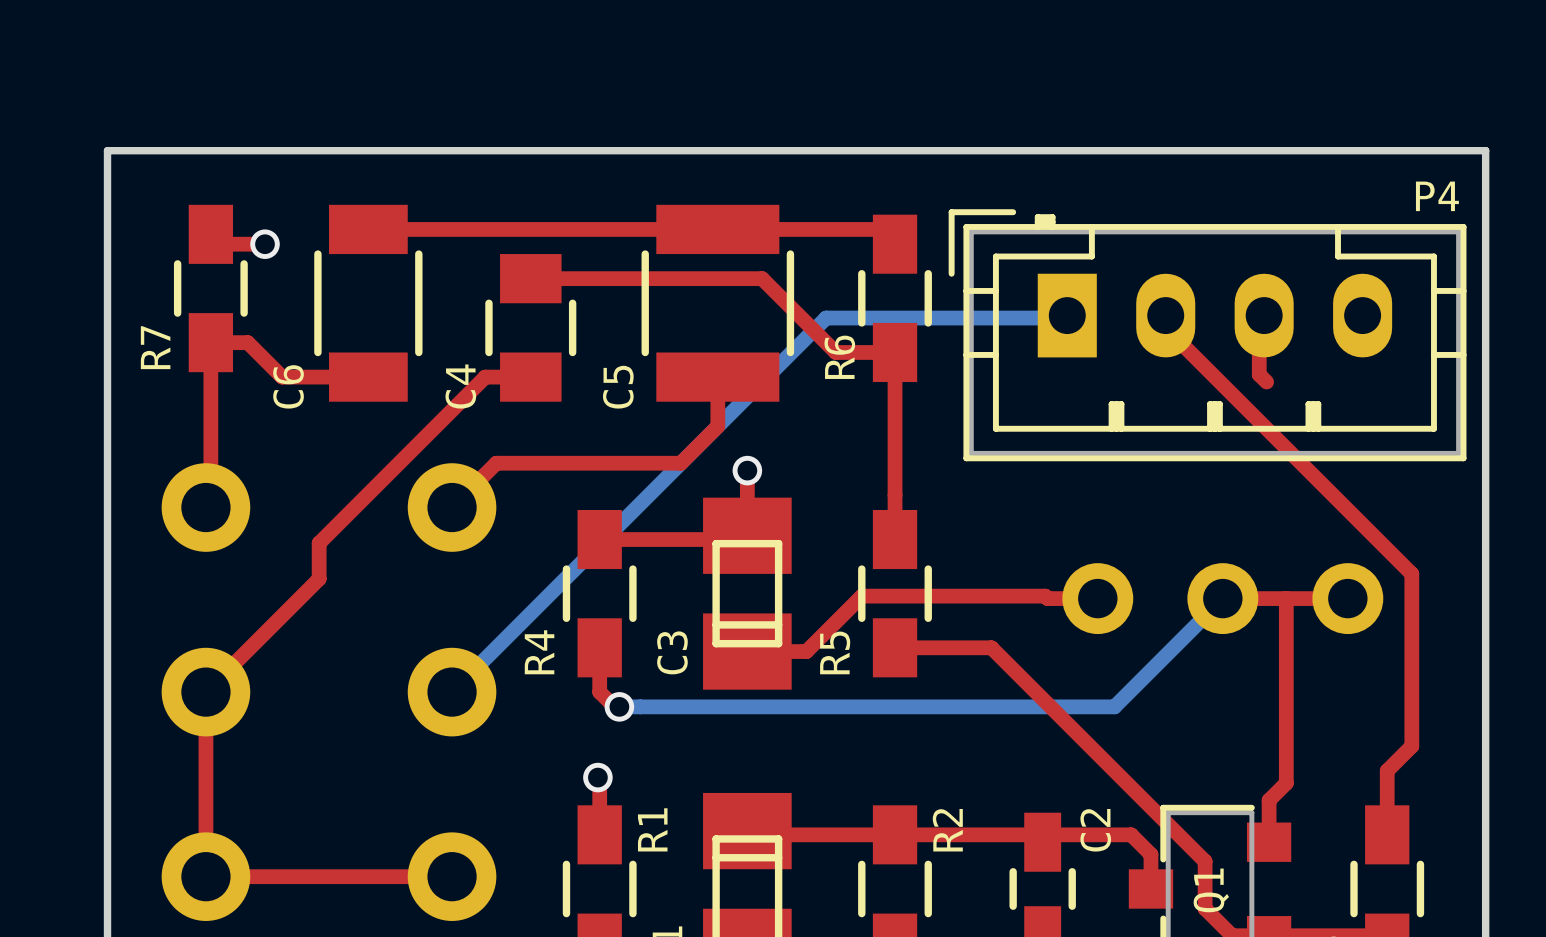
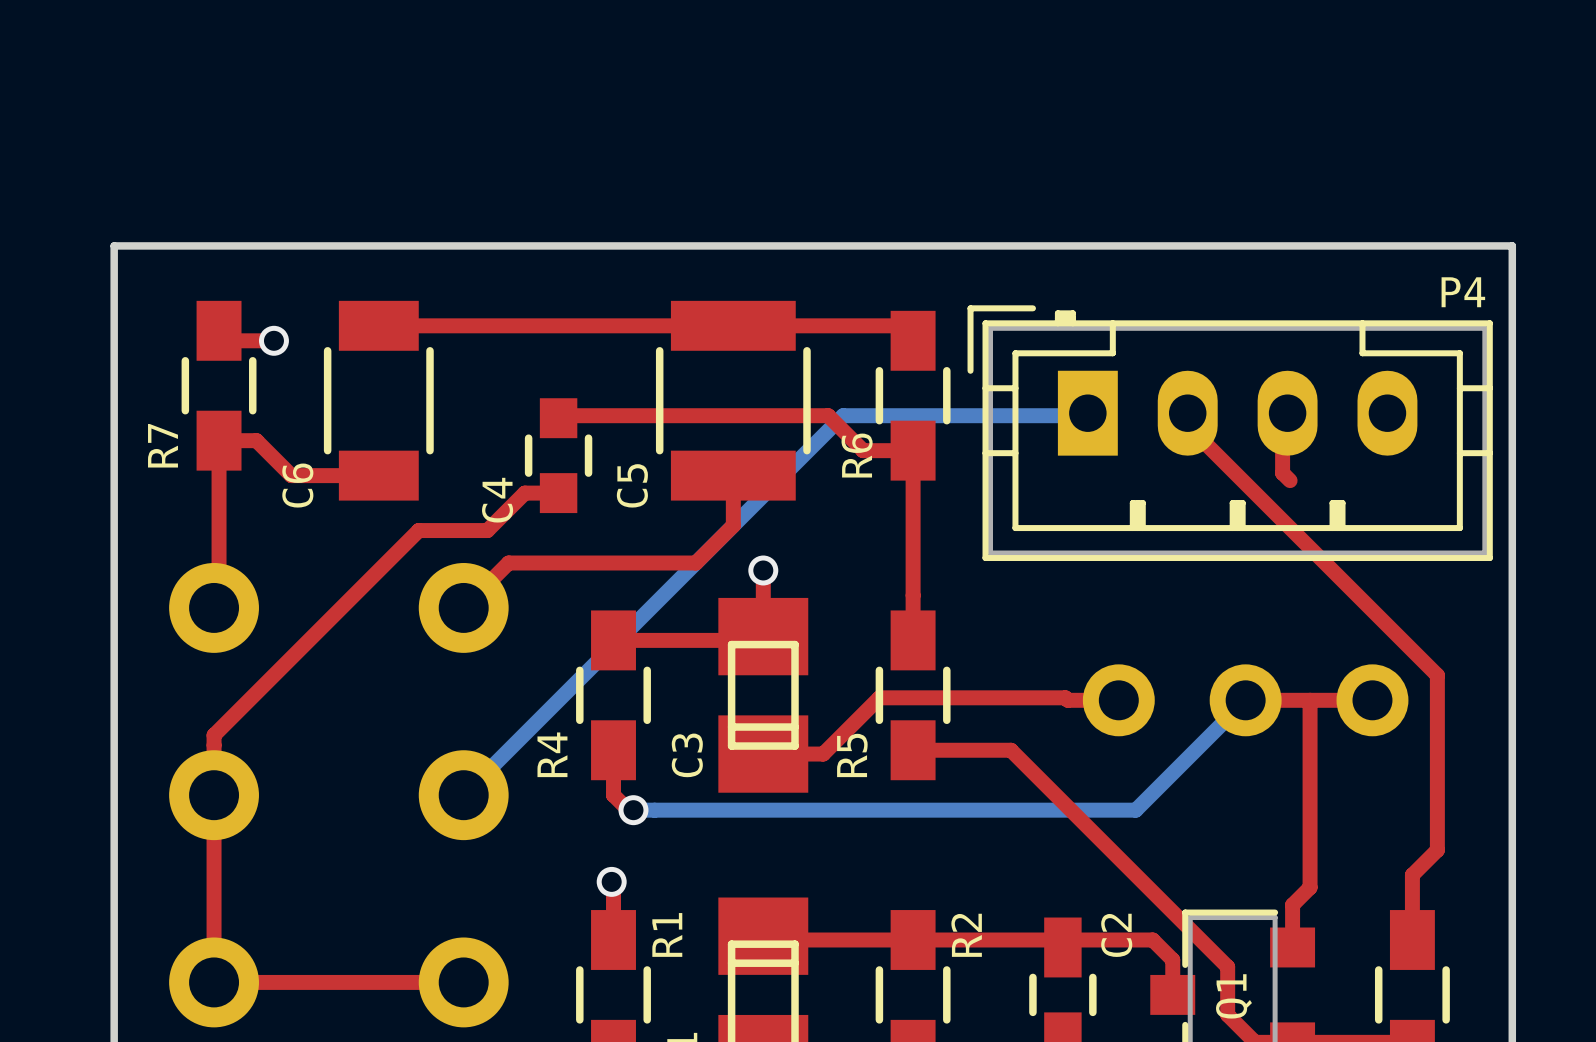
C4 footprint: [485, 254, 577, 402] -> [524, 398, 593, 514]
top track: (530, 278) (762, 278) (835, 352) (845, 352) -> (558, 418) (561, 415) (828, 415) (863, 450)
top track: (530, 377) (485, 377) (319, 543) (319, 578) (205, 692) -> (558, 493) (524, 493) (487, 530) (418, 530) (214, 735) (214, 795)

